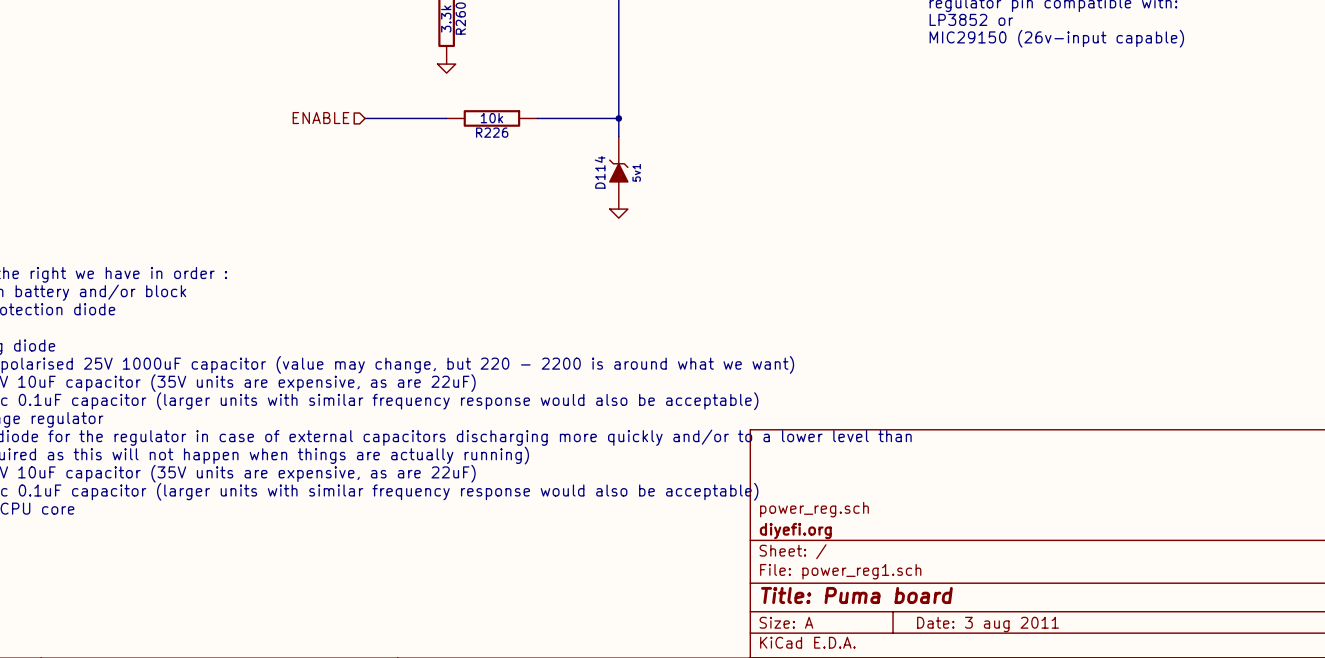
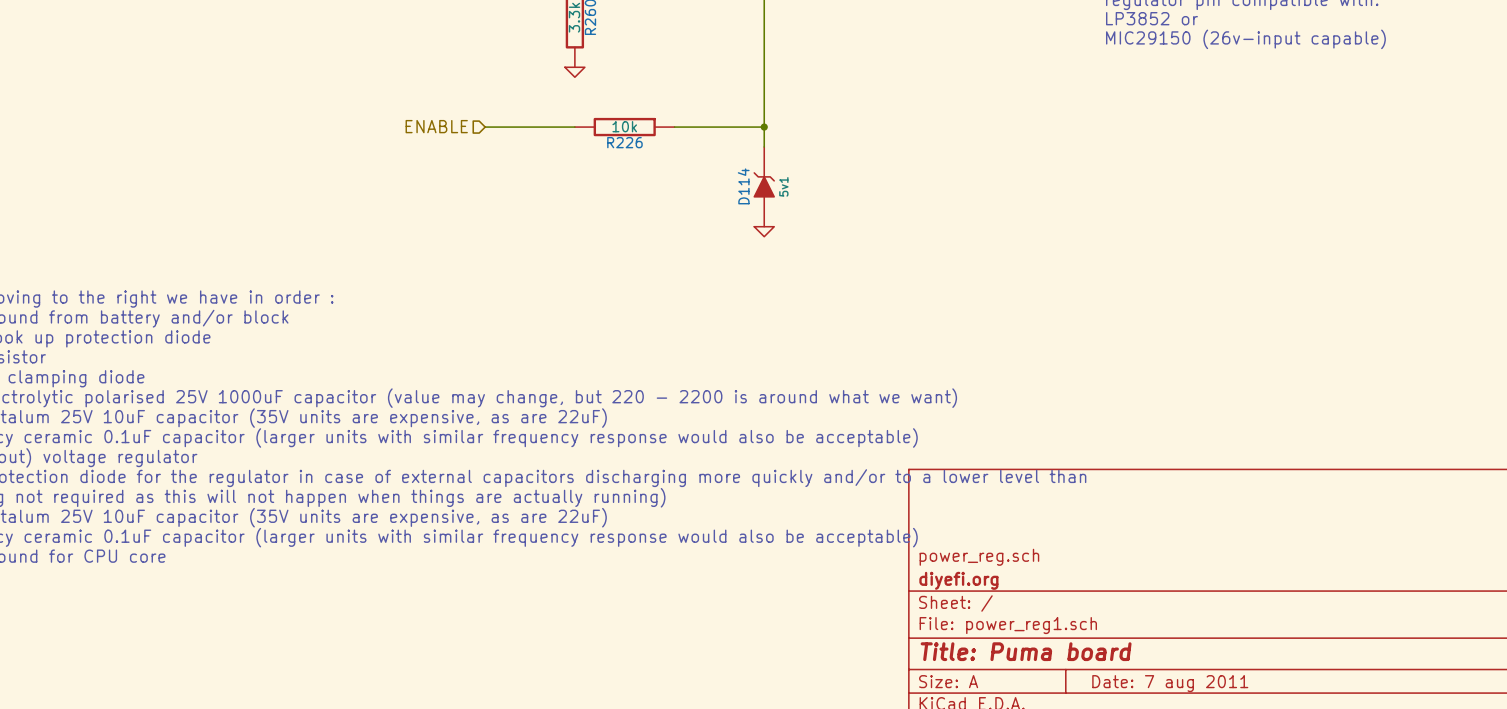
title block: Date: 3 aug 2011 (988, 624) -> Date: 7 aug 2011 (1170, 683)

